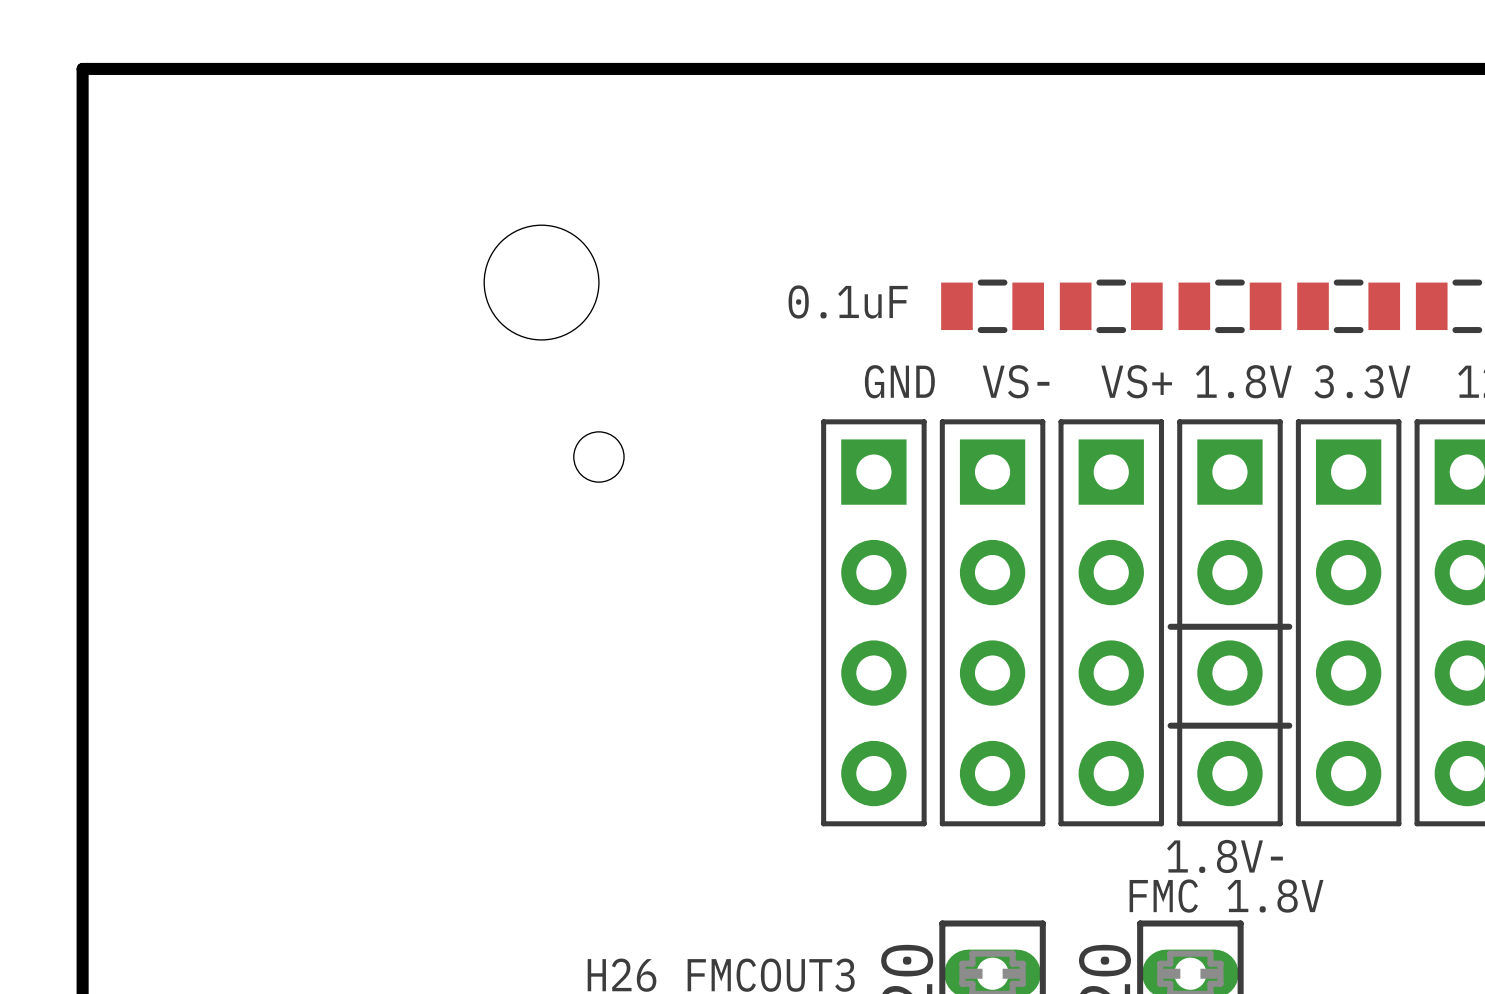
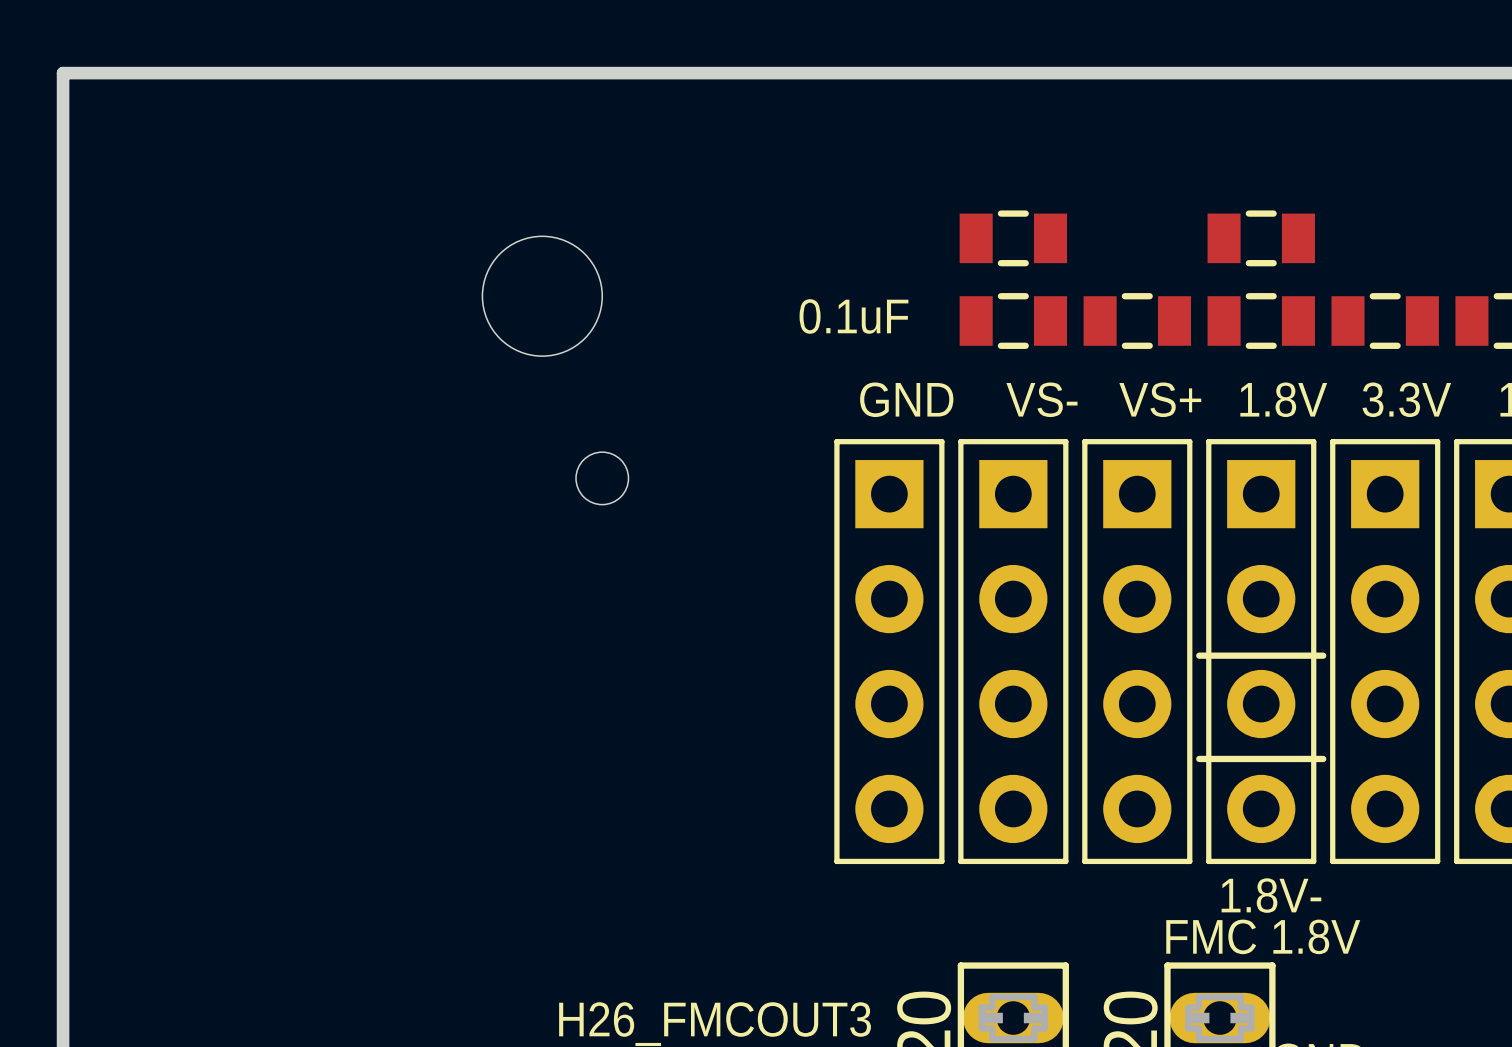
part: none -> (1013, 238)
part: none -> (1261, 238)

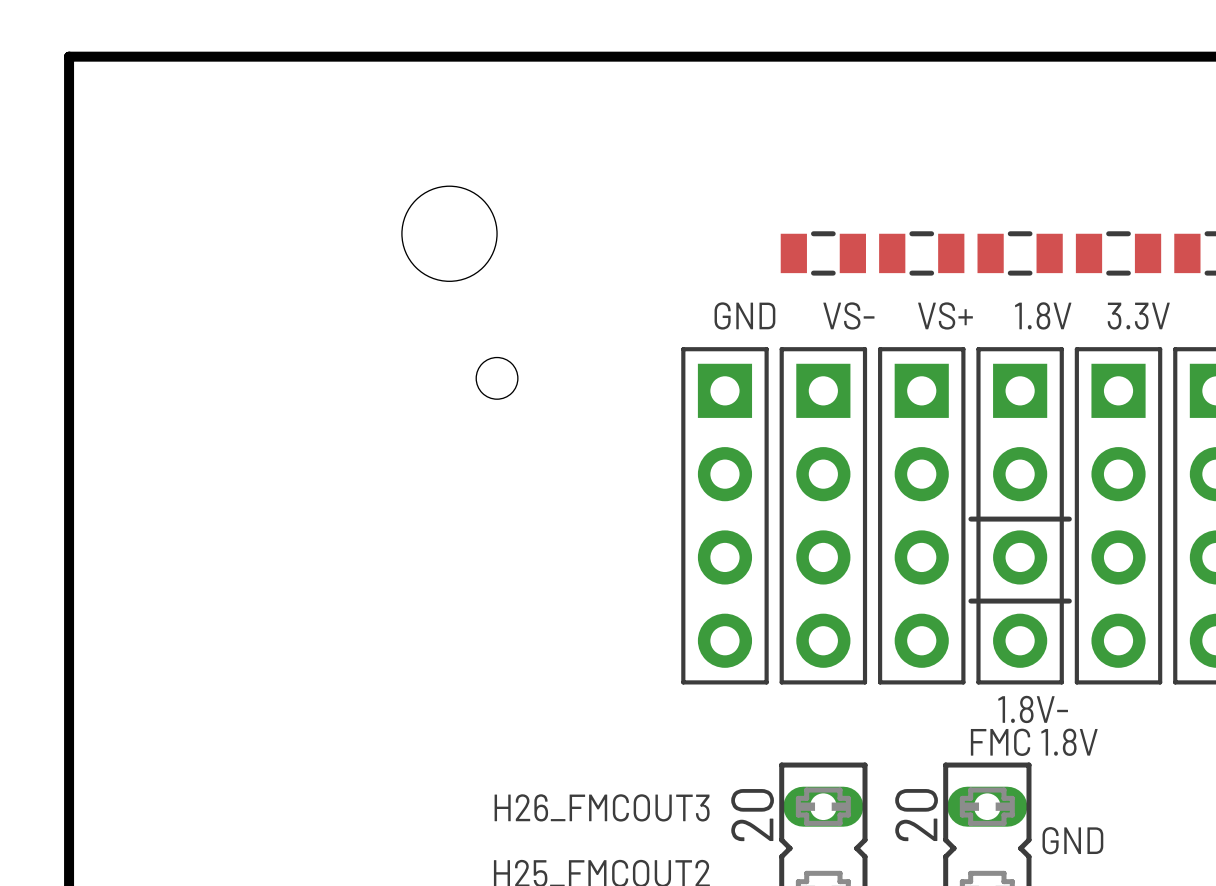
part: (1013, 238) -> none
part: (1261, 238) -> none
part value: 0.1uF (853, 316) -> none

